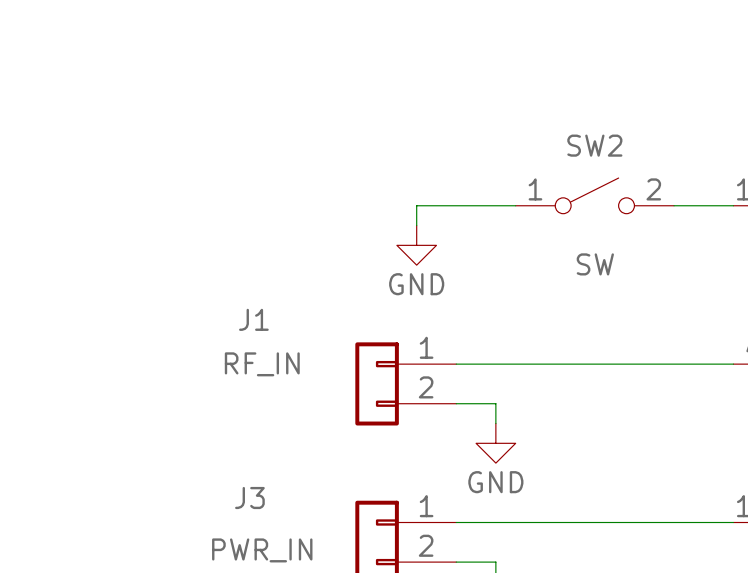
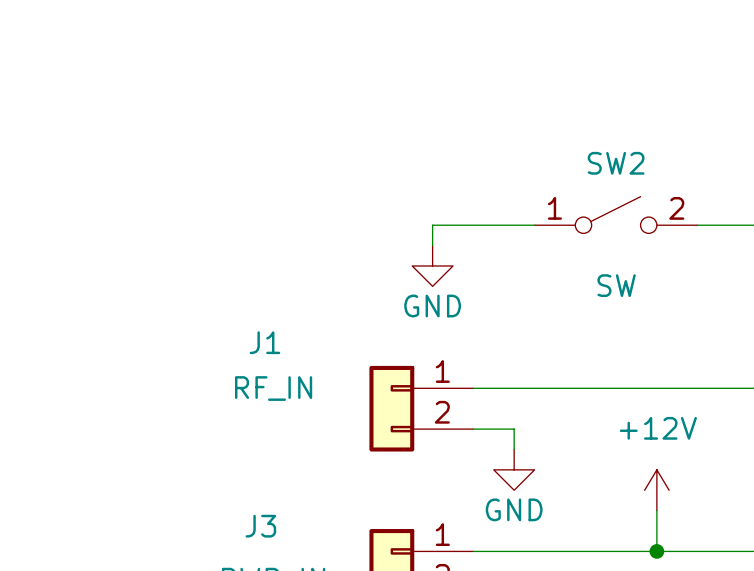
power symbol: none -> +12V (656, 490)
wire: none -> (656, 510) (656, 551)
junction: none -> (656, 551)

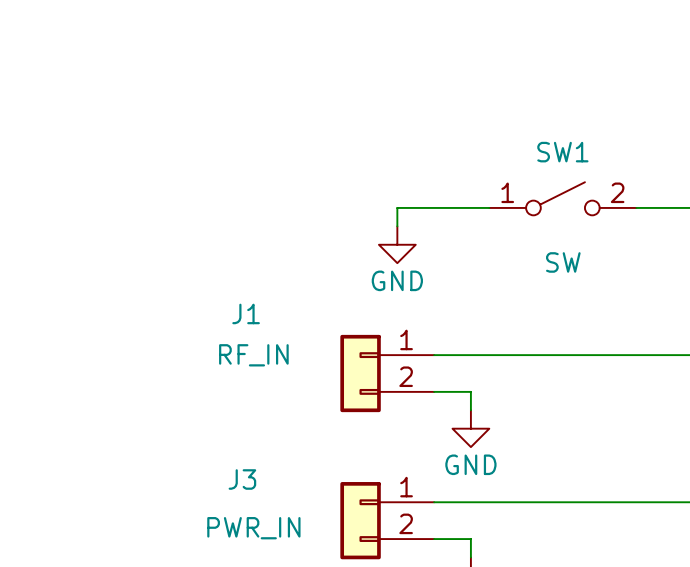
SW2 name: SW2 (616, 163) -> SW1 (562, 152)
power symbol: +12V (656, 490) -> none
wire: (656, 510) (656, 551) -> none
junction: (656, 551) -> none

